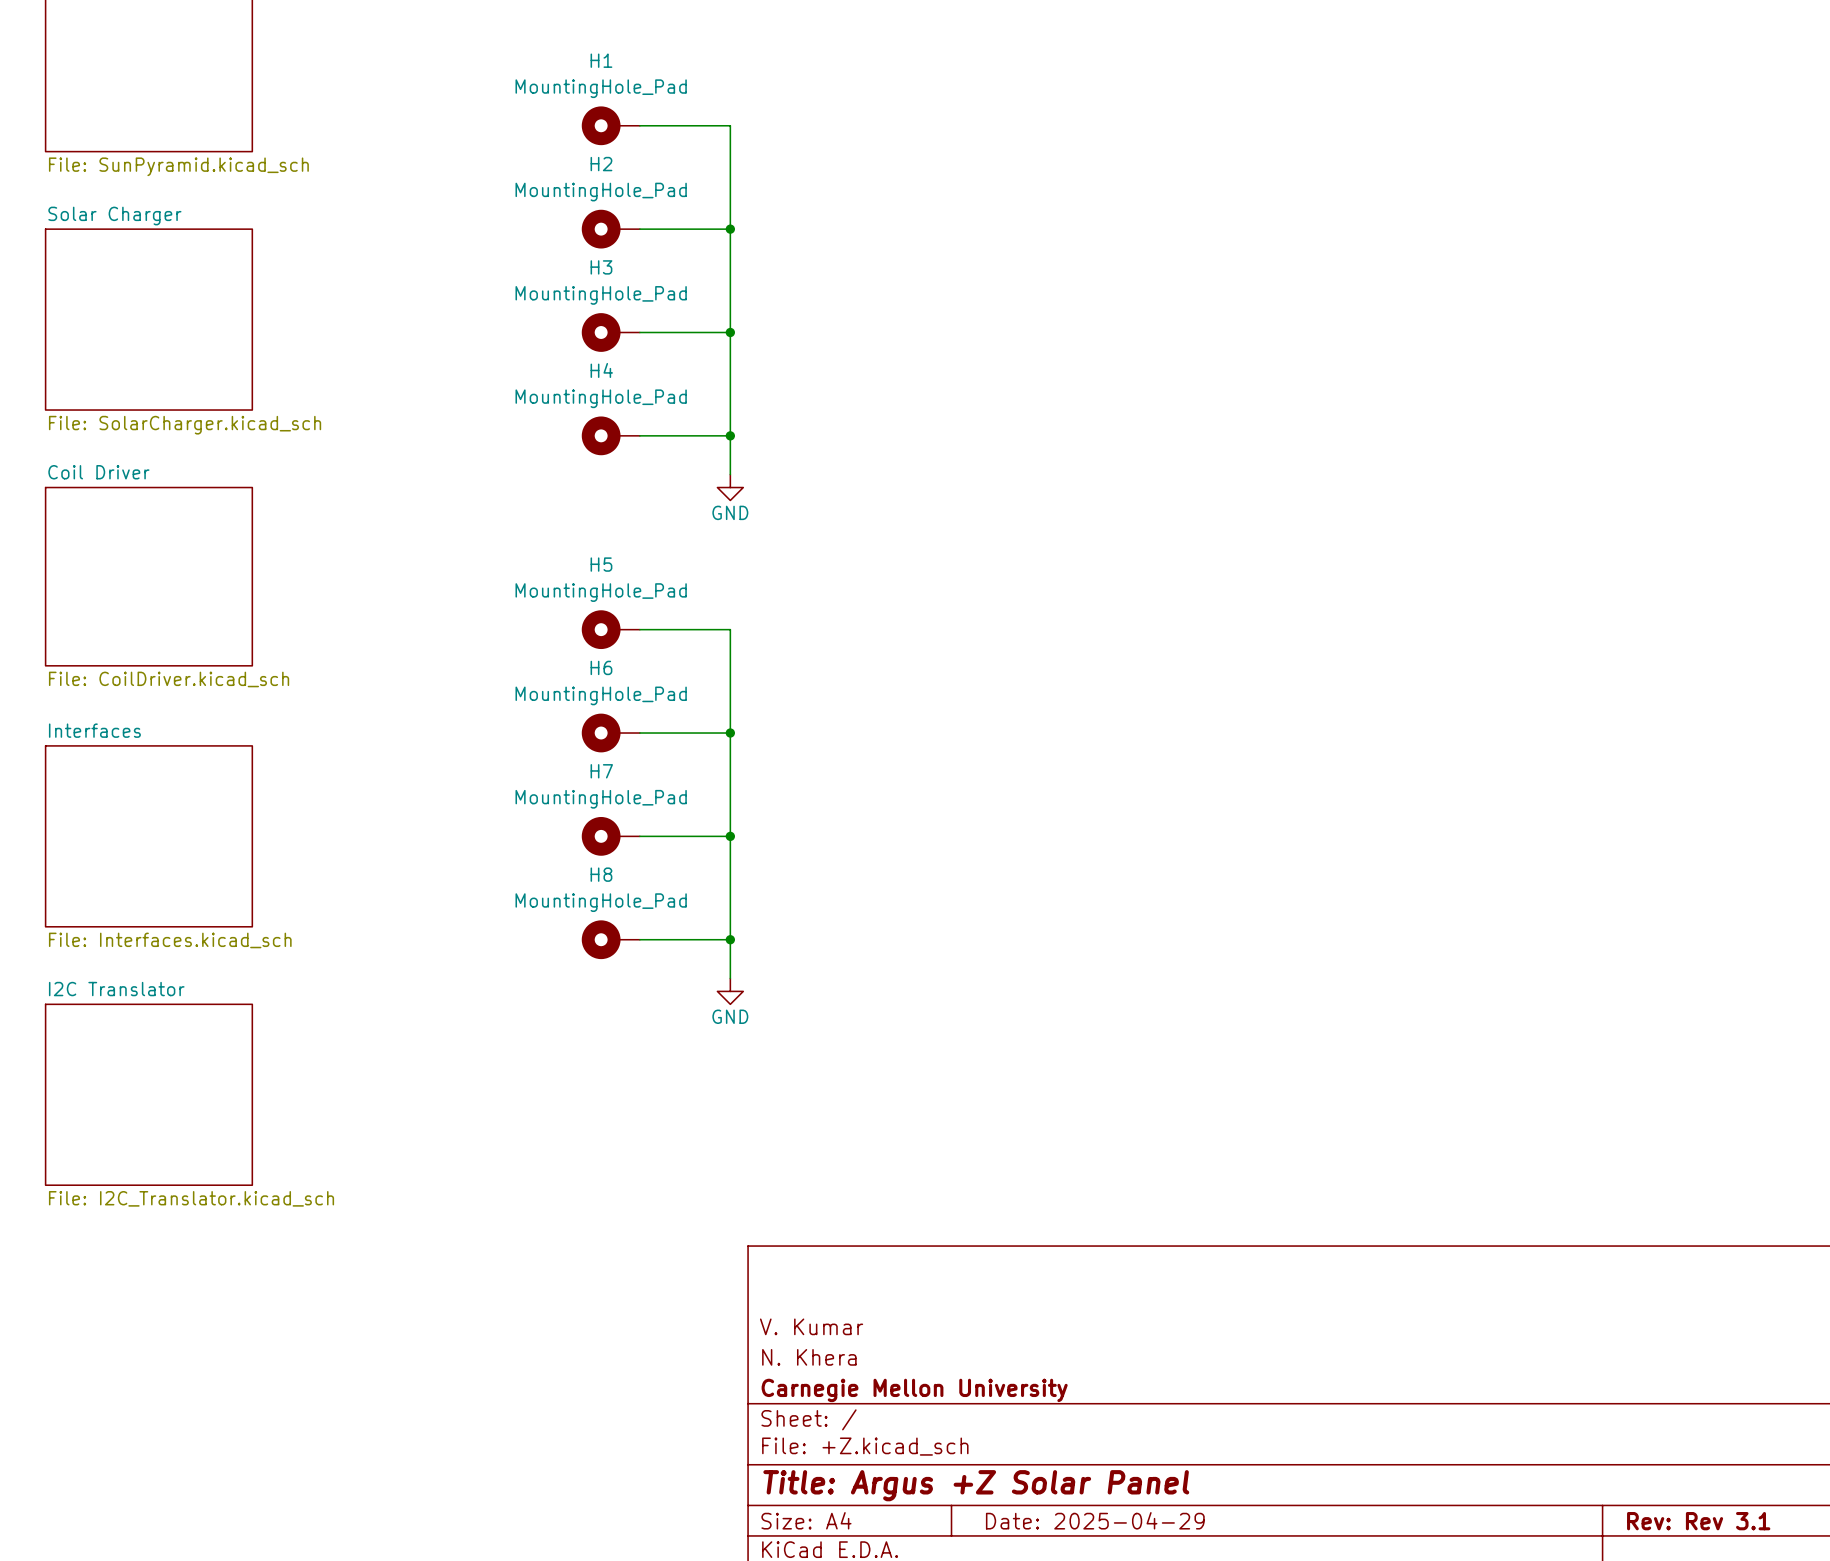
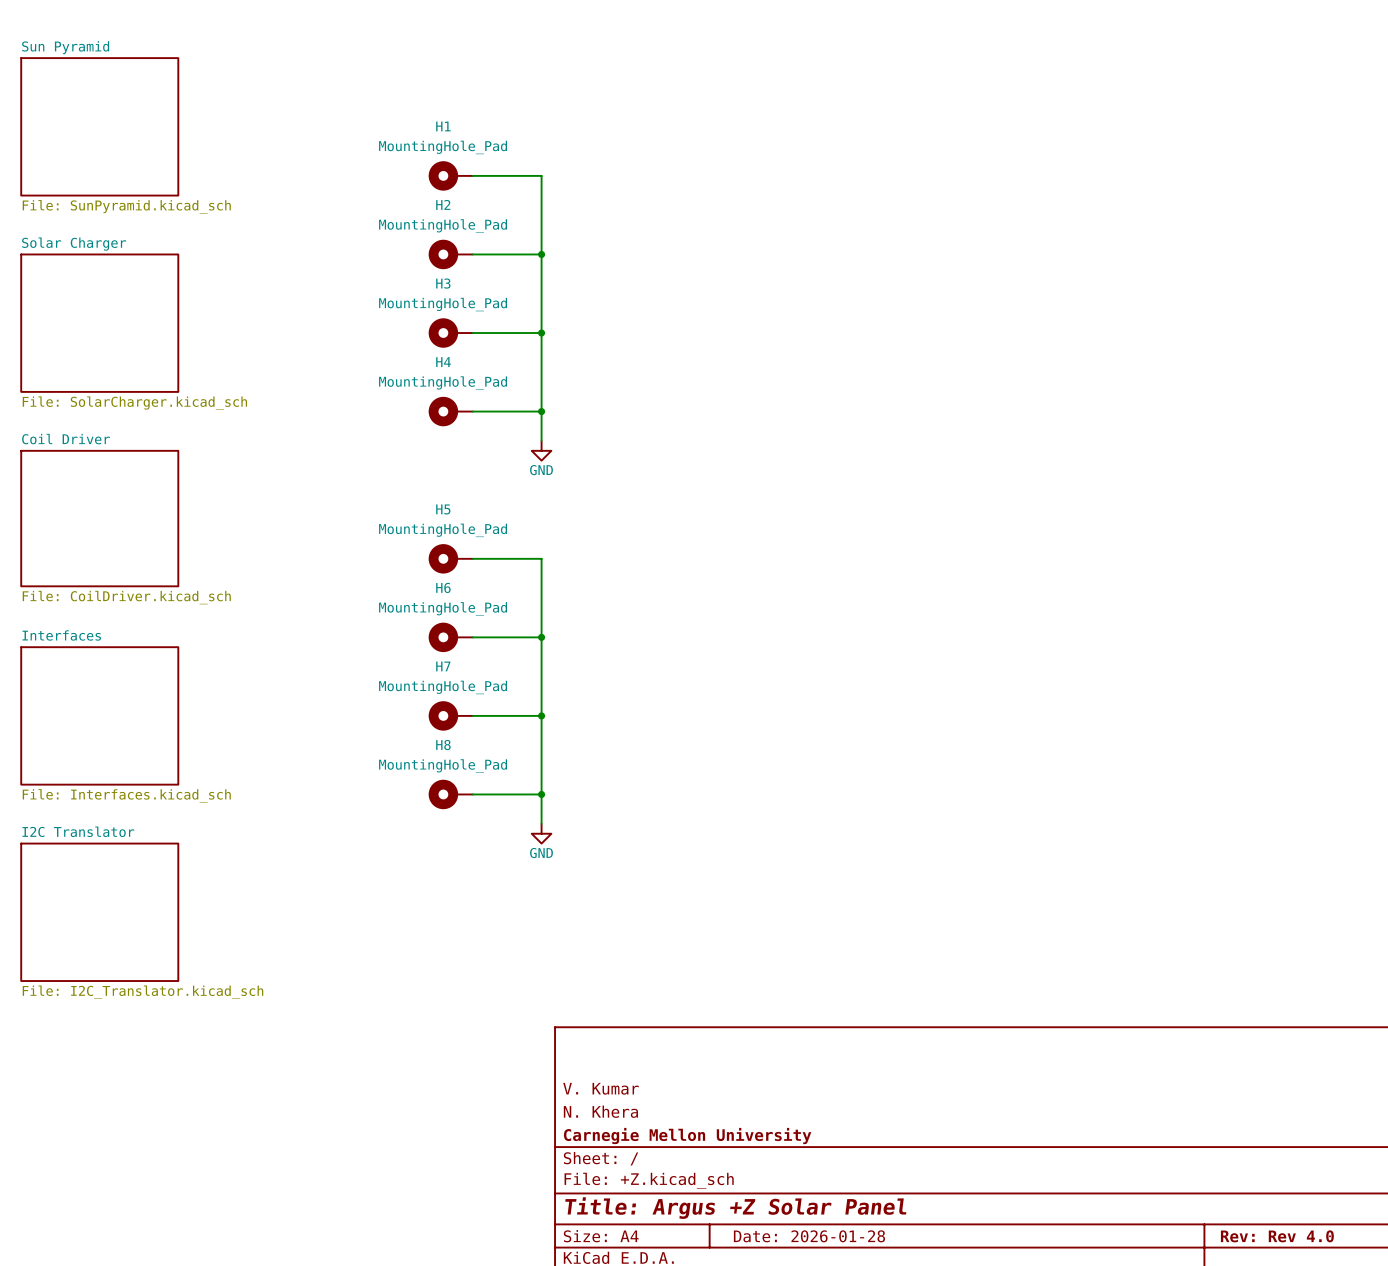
title block: Date: 2025-04-29 (1095, 1520) -> Date: 2026-01-28 (809, 1236)
title block: Rev: Rev 3.1 (1698, 1521) -> Rev: Rev 4.0 (1277, 1236)

